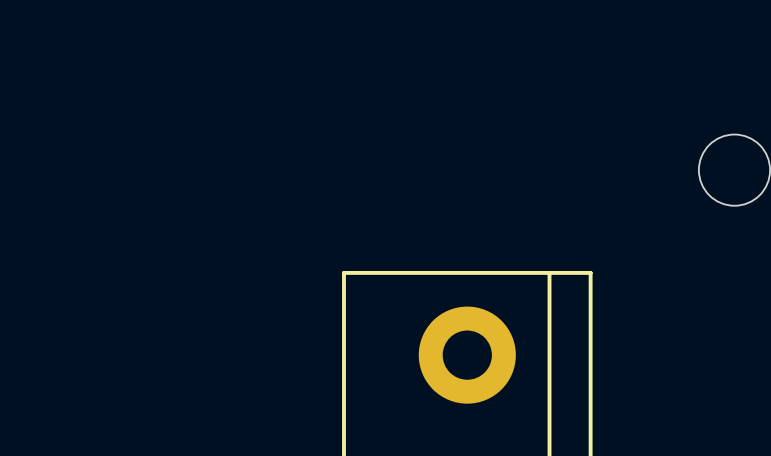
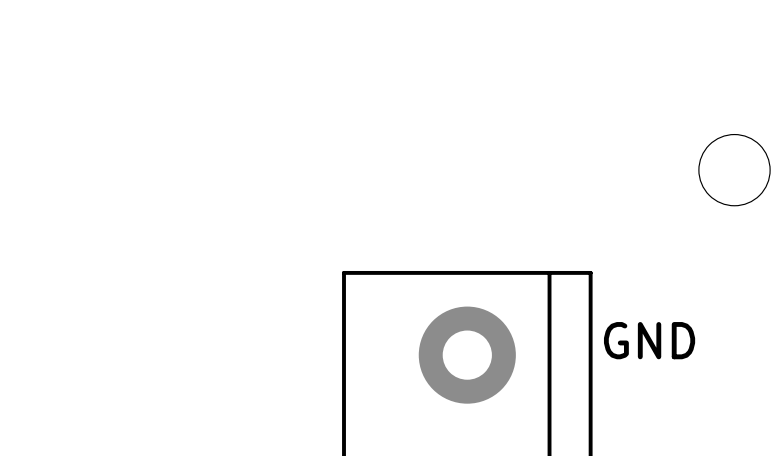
text: none -> GND (649, 340)

